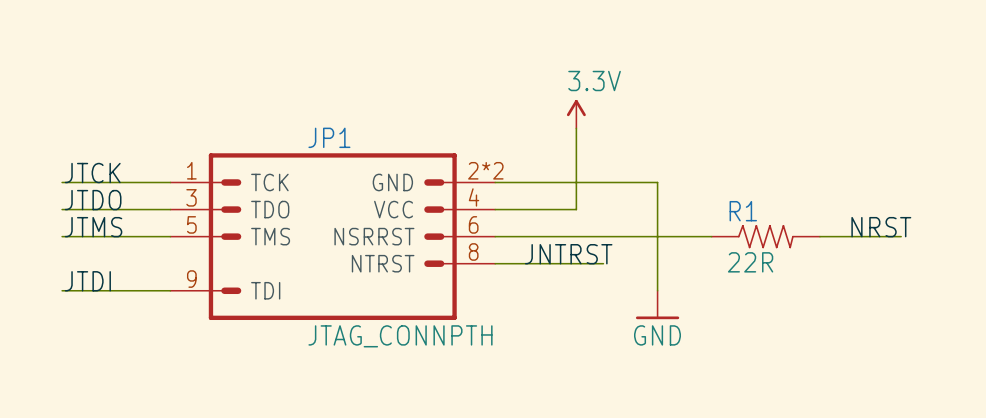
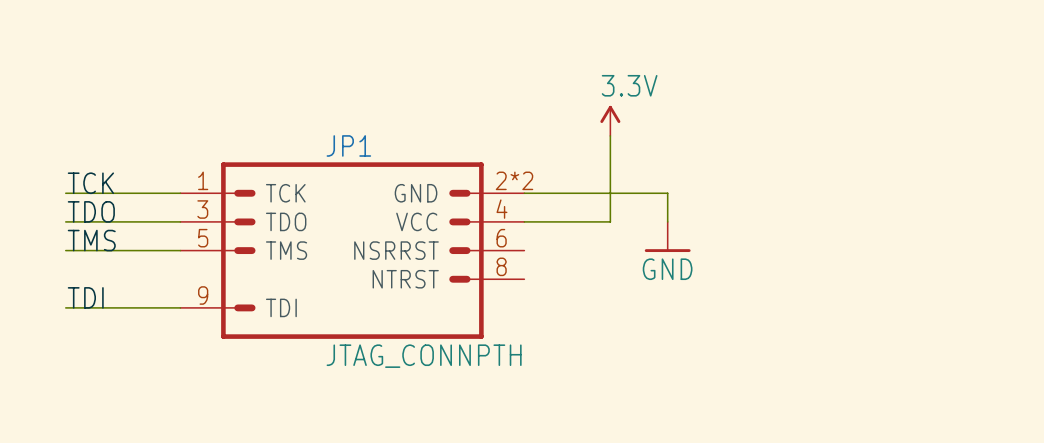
label: JTCK (92, 173) -> TCK (90, 183)
wire: (630, 182) (657, 182) (657, 290) -> (667, 193) (667, 221)
label: JTDO (93, 200) -> TDO (91, 211)
label: JTMS (93, 227) -> TMS (91, 240)
label: NRST (881, 227) -> none
wire: (495, 236) (711, 236) -> none
R1: 22R (765, 236) -> none
wire: (819, 236) (901, 236) -> none
label: JNTRST (568, 254) -> none
wire: (495, 263) (603, 263) -> none
label: JTDI (87, 281) -> TDI (85, 297)
power symbol position: GND (657, 304) -> GND (667, 236)

